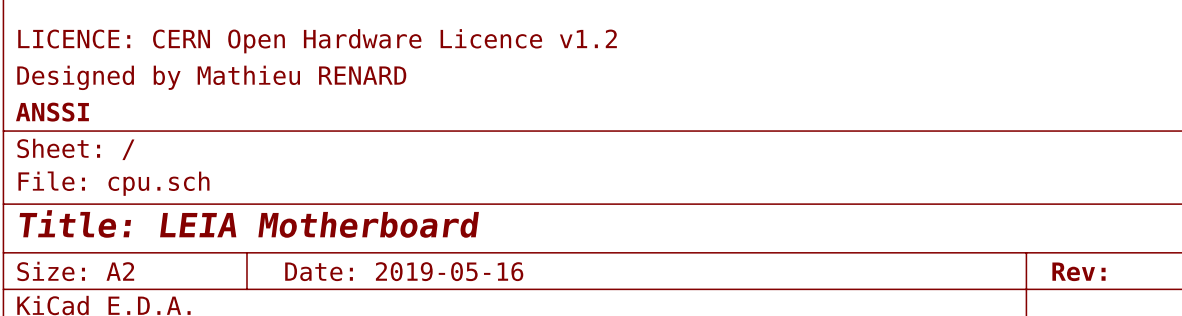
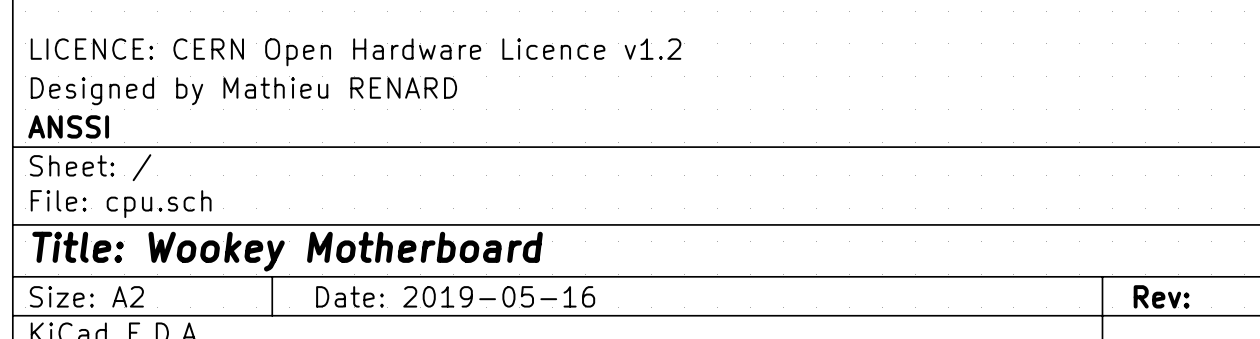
title block: Title: LEIA Motherboard (249, 223) -> Title: Wookey Motherboard (287, 251)

